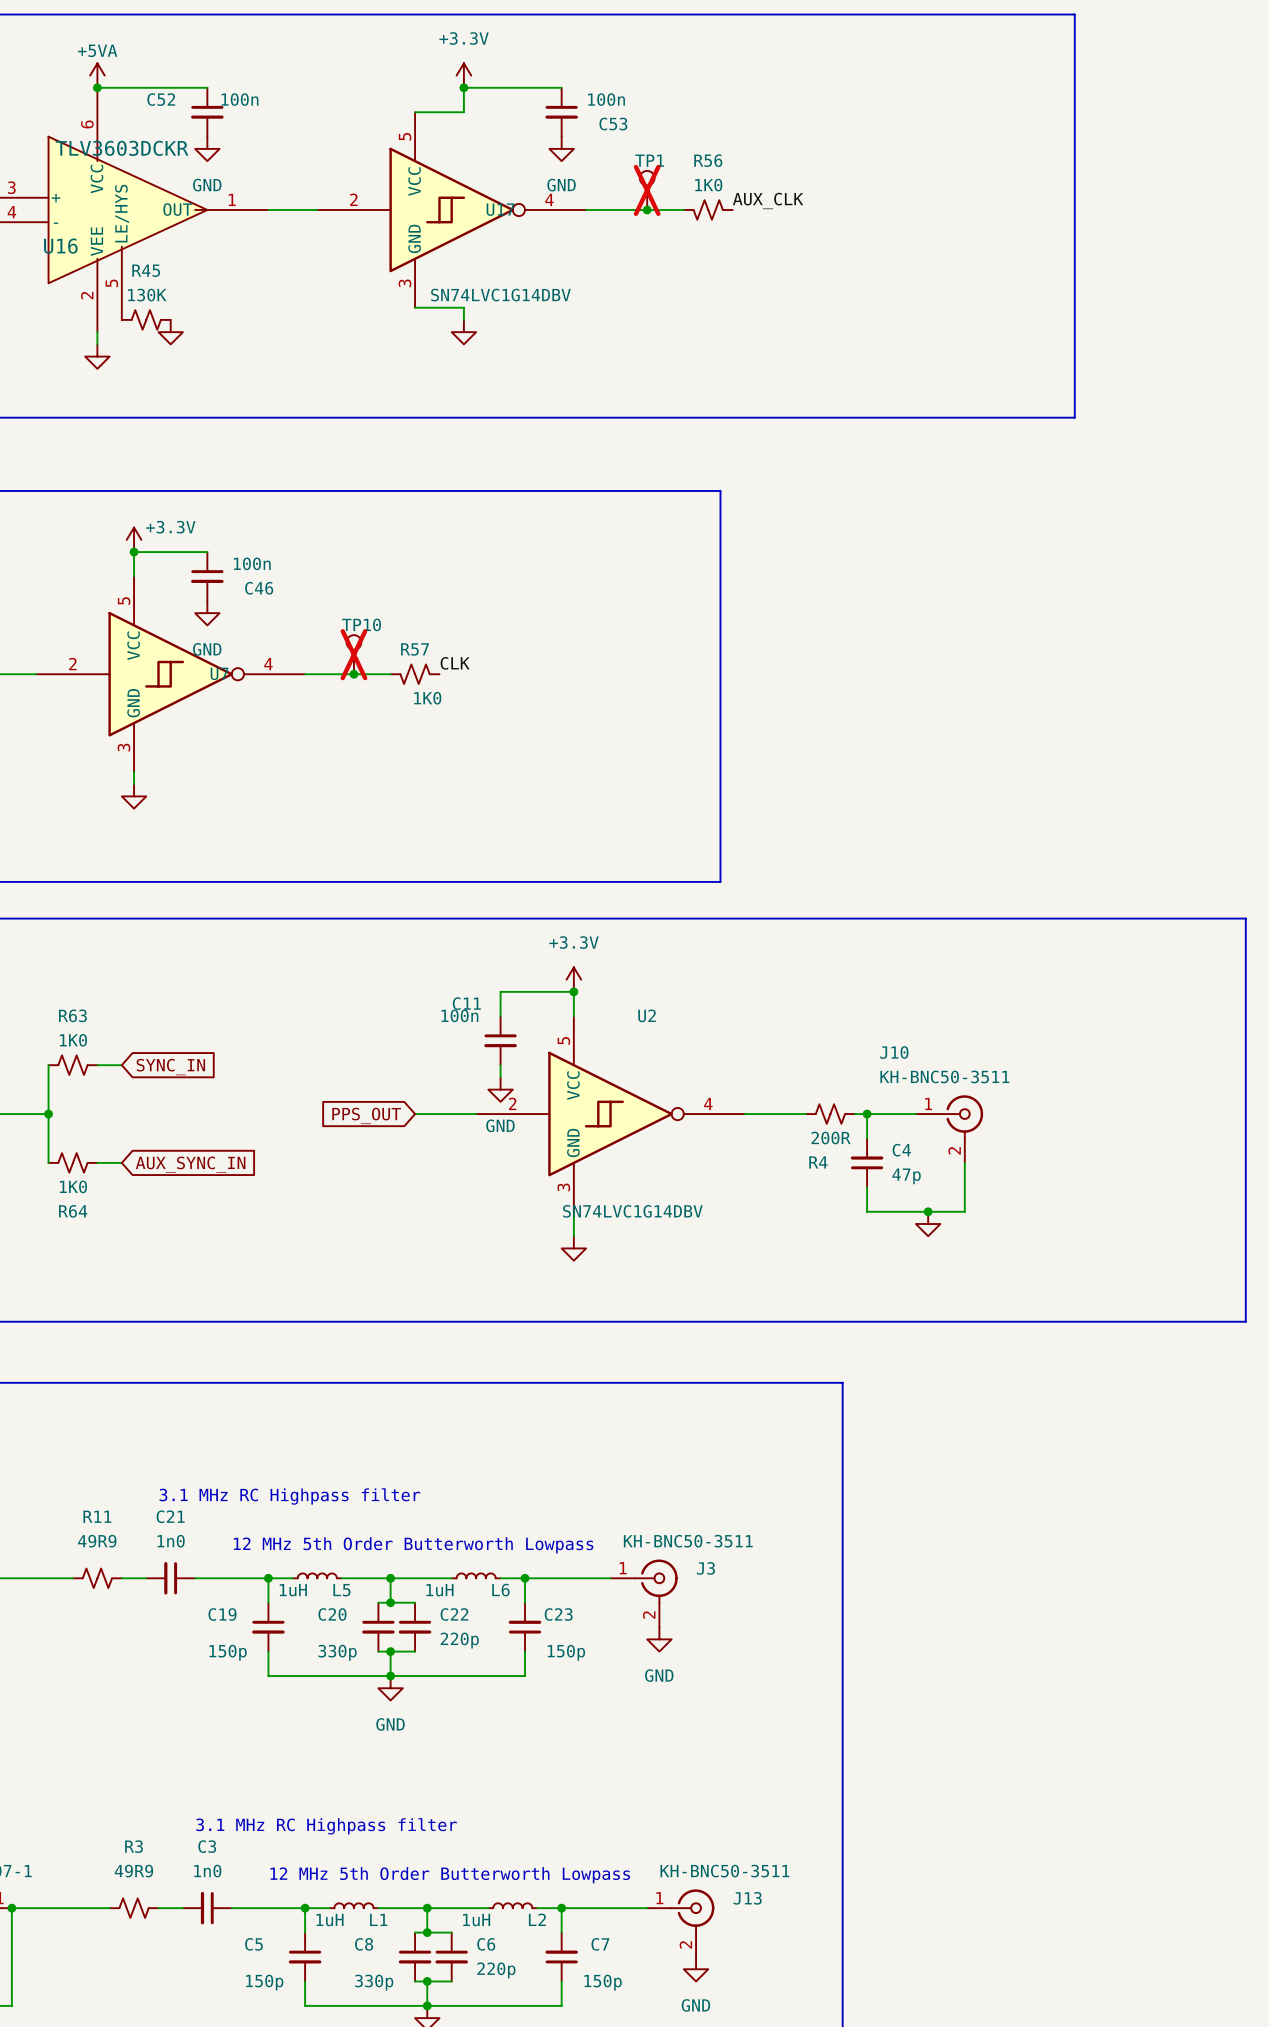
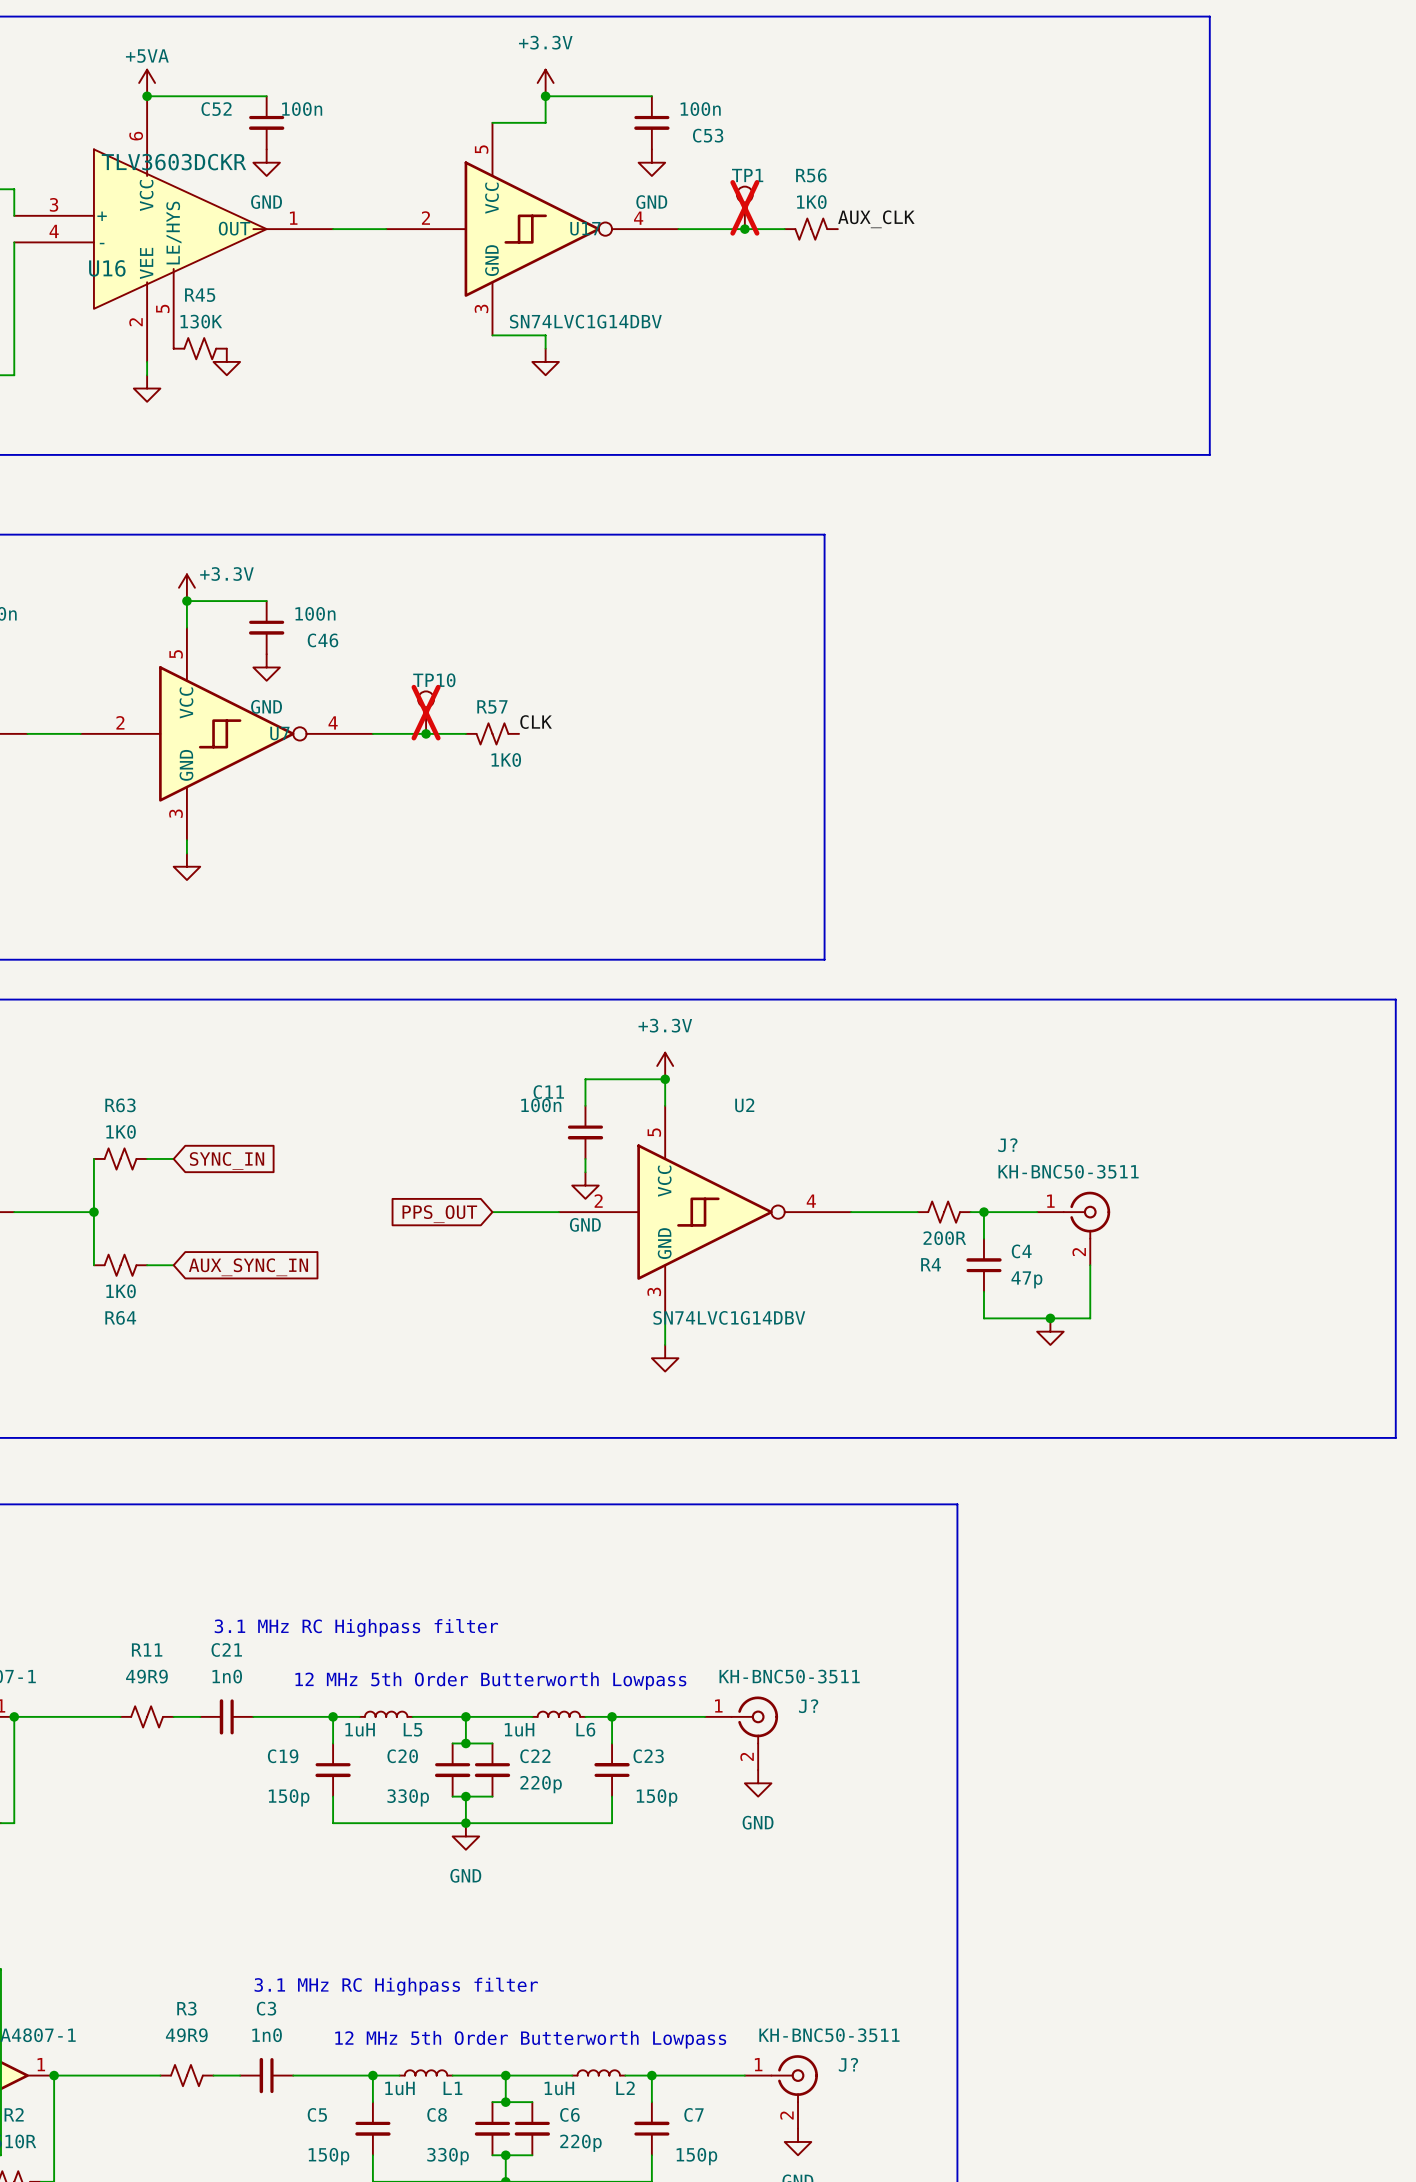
J10 name: J10 (894, 1052) -> J? (1007, 1145)
J3 name: J3 (705, 1568) -> J? (808, 1706)
J13 name: J13 (747, 1898) -> J? (848, 2064)

